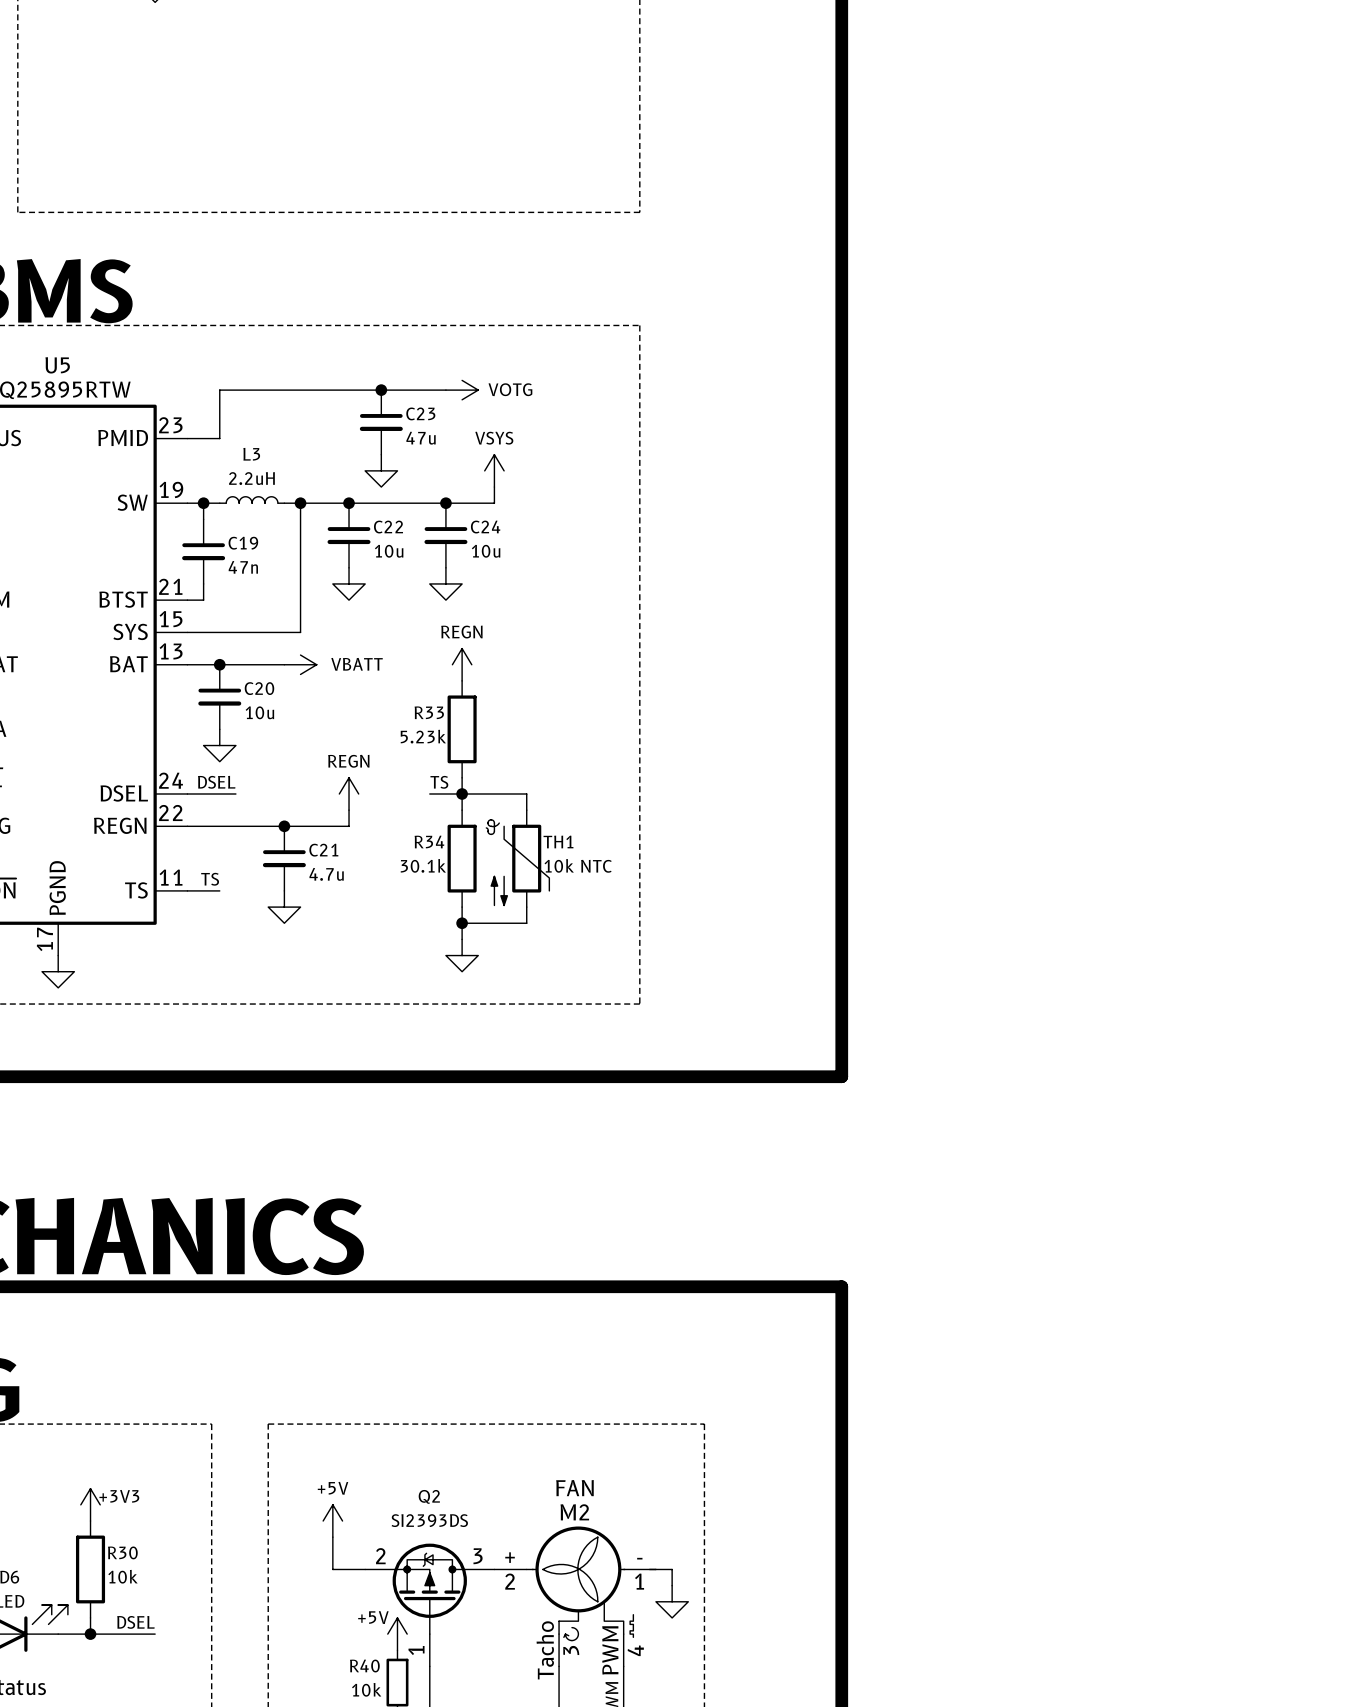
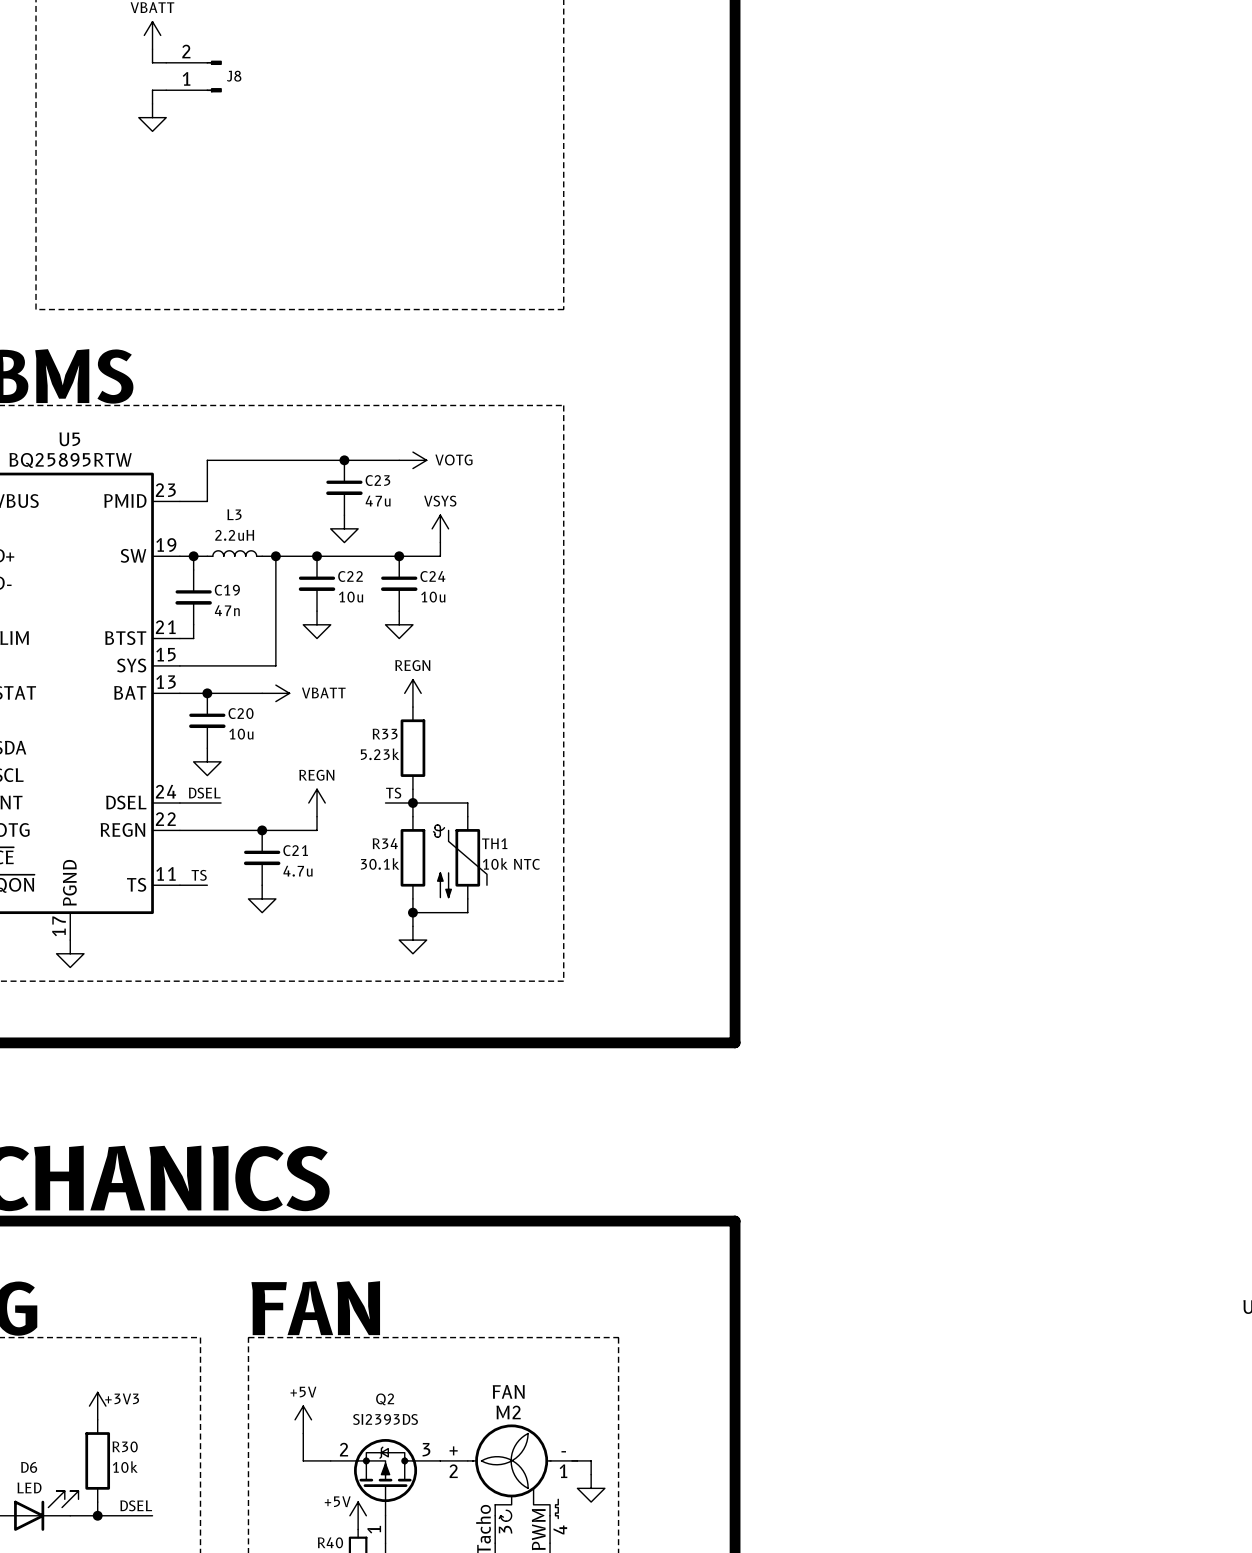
text: none -> FAN (315, 1308)

